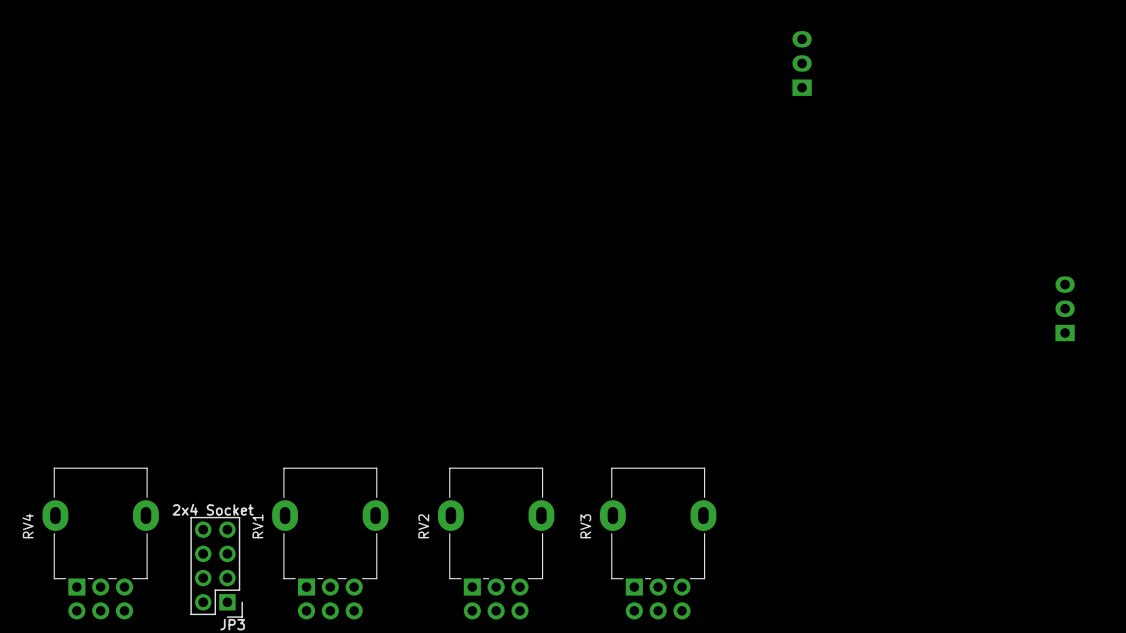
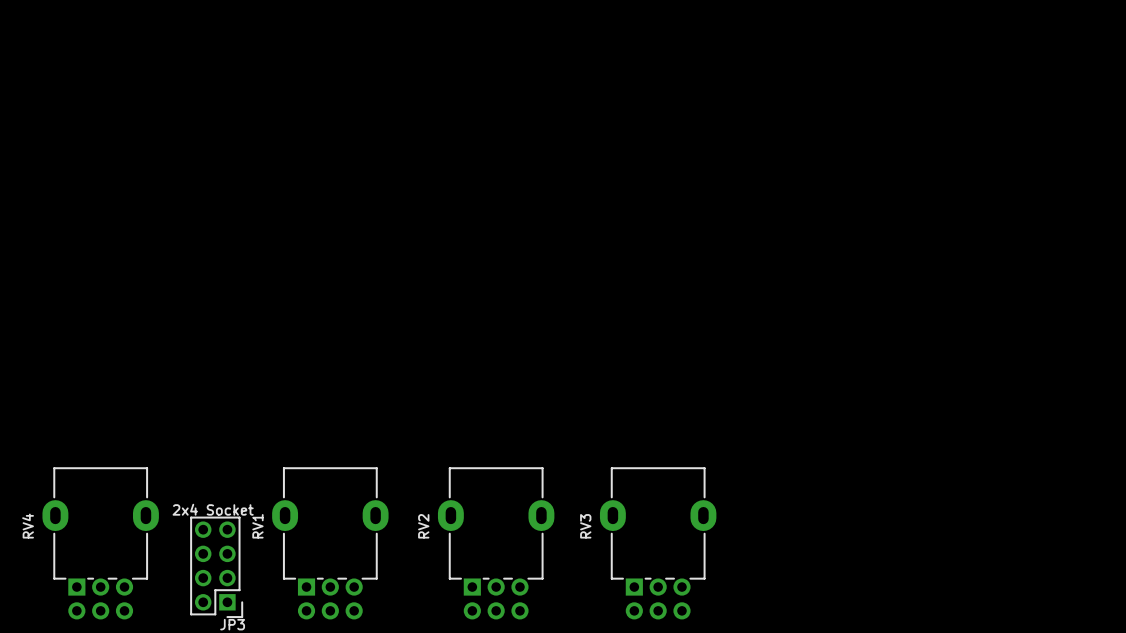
part: (802, 63) -> none
part: (1065, 308) -> none

